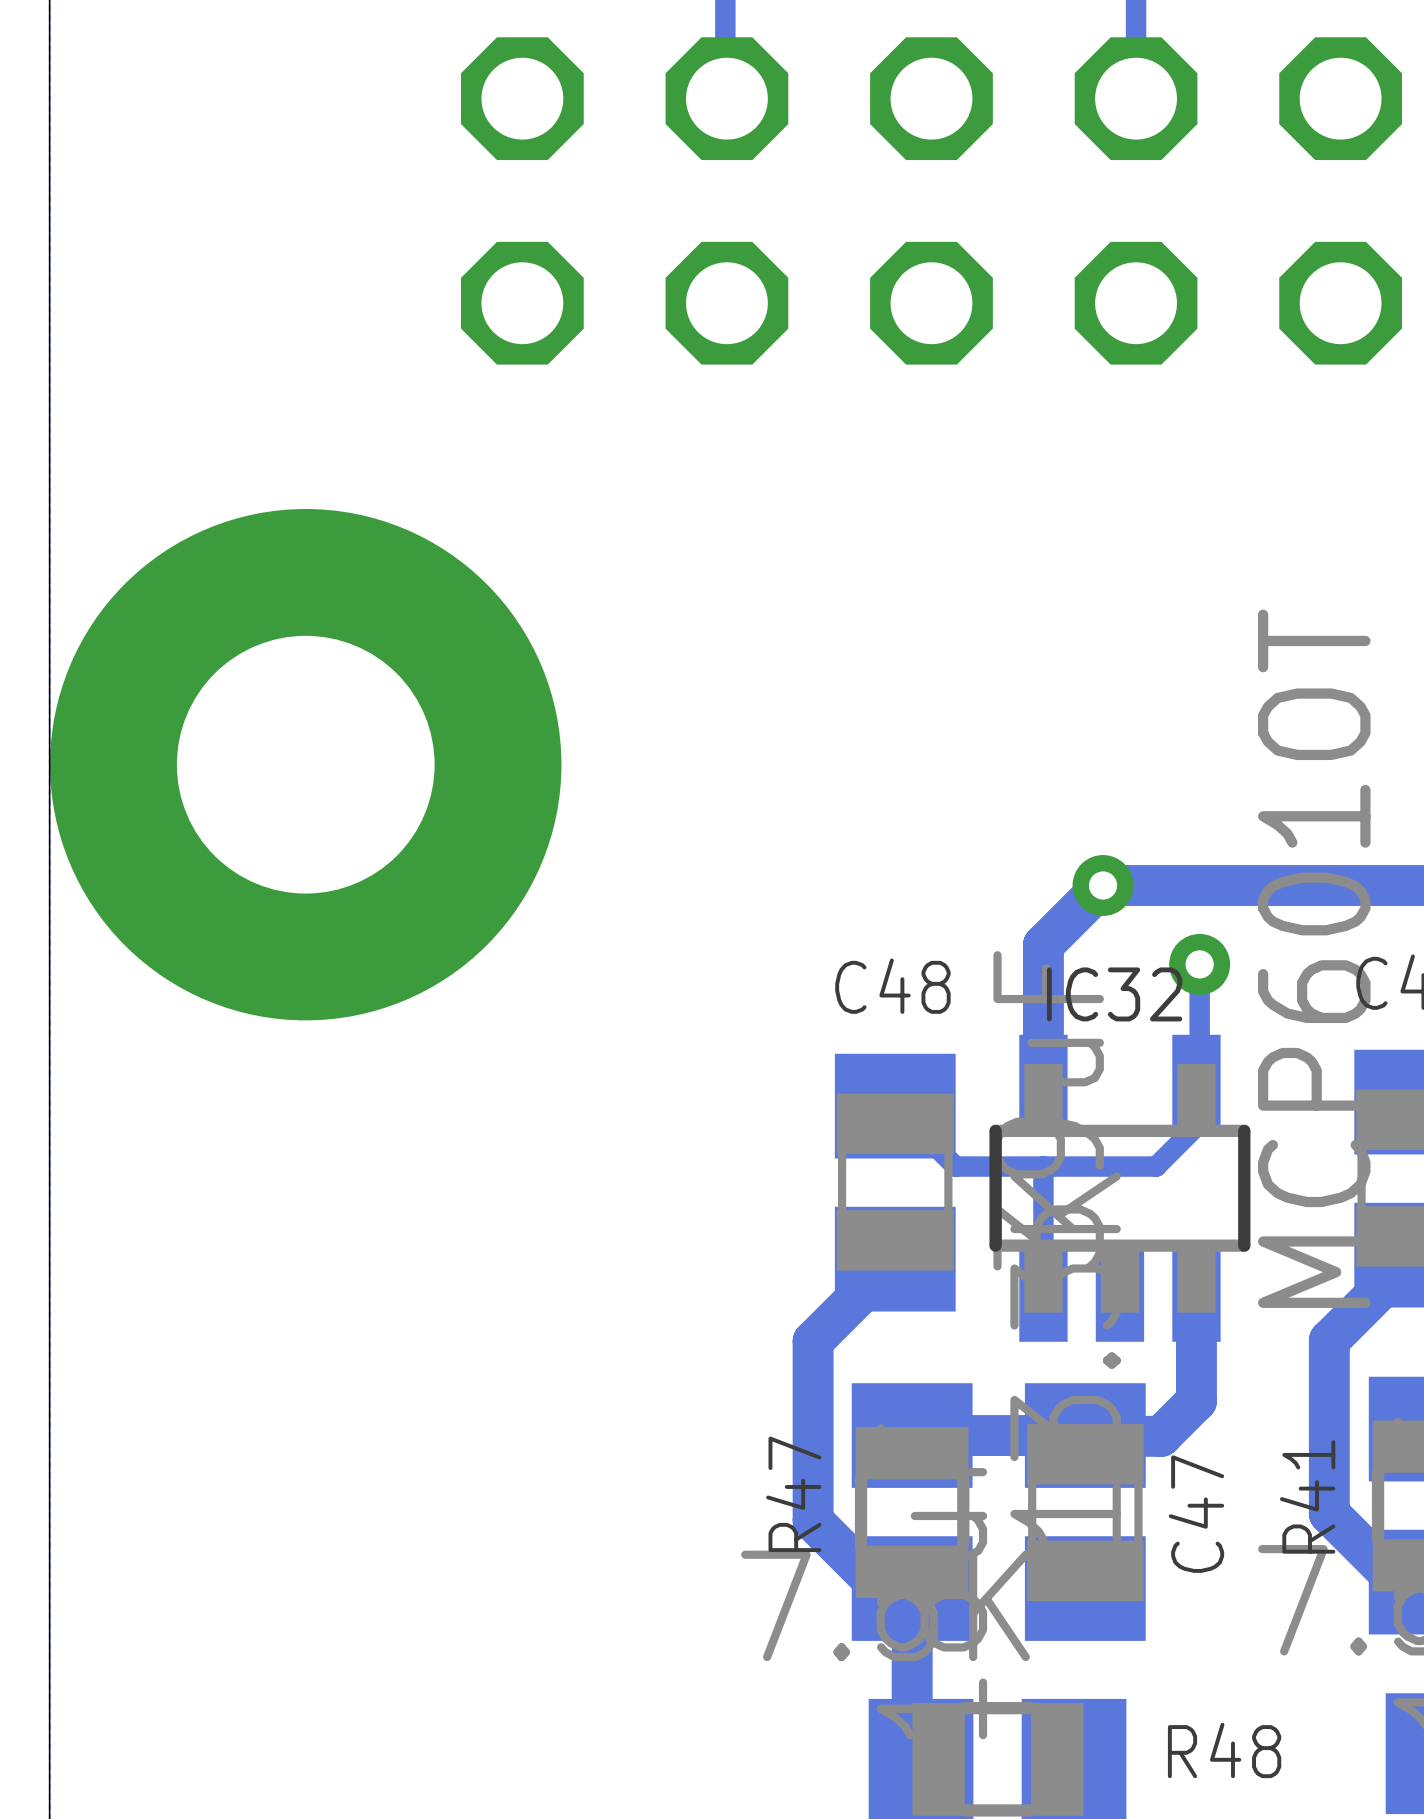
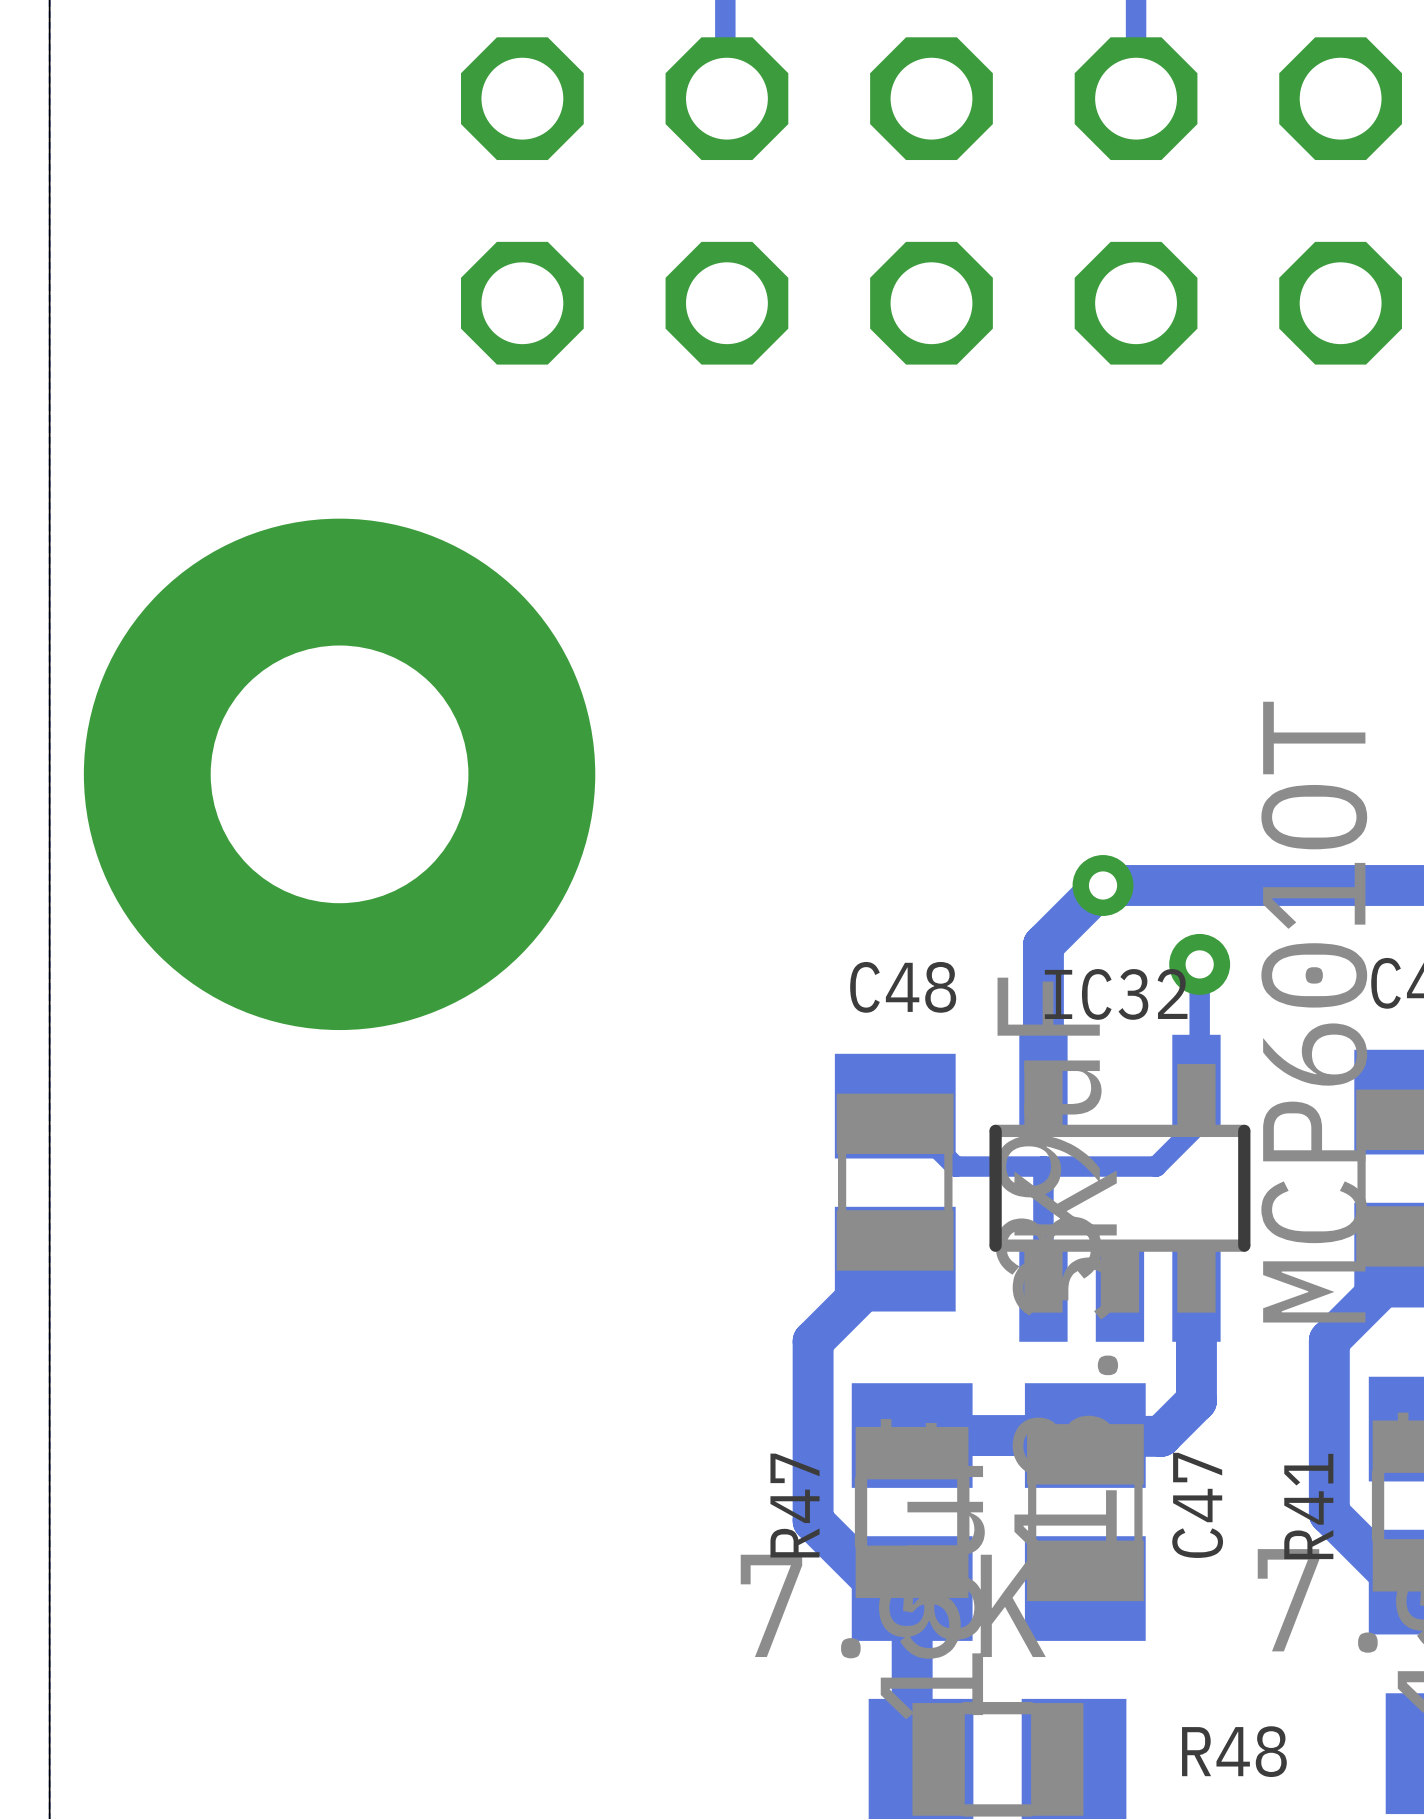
via position: (305, 764) -> (339, 774)

